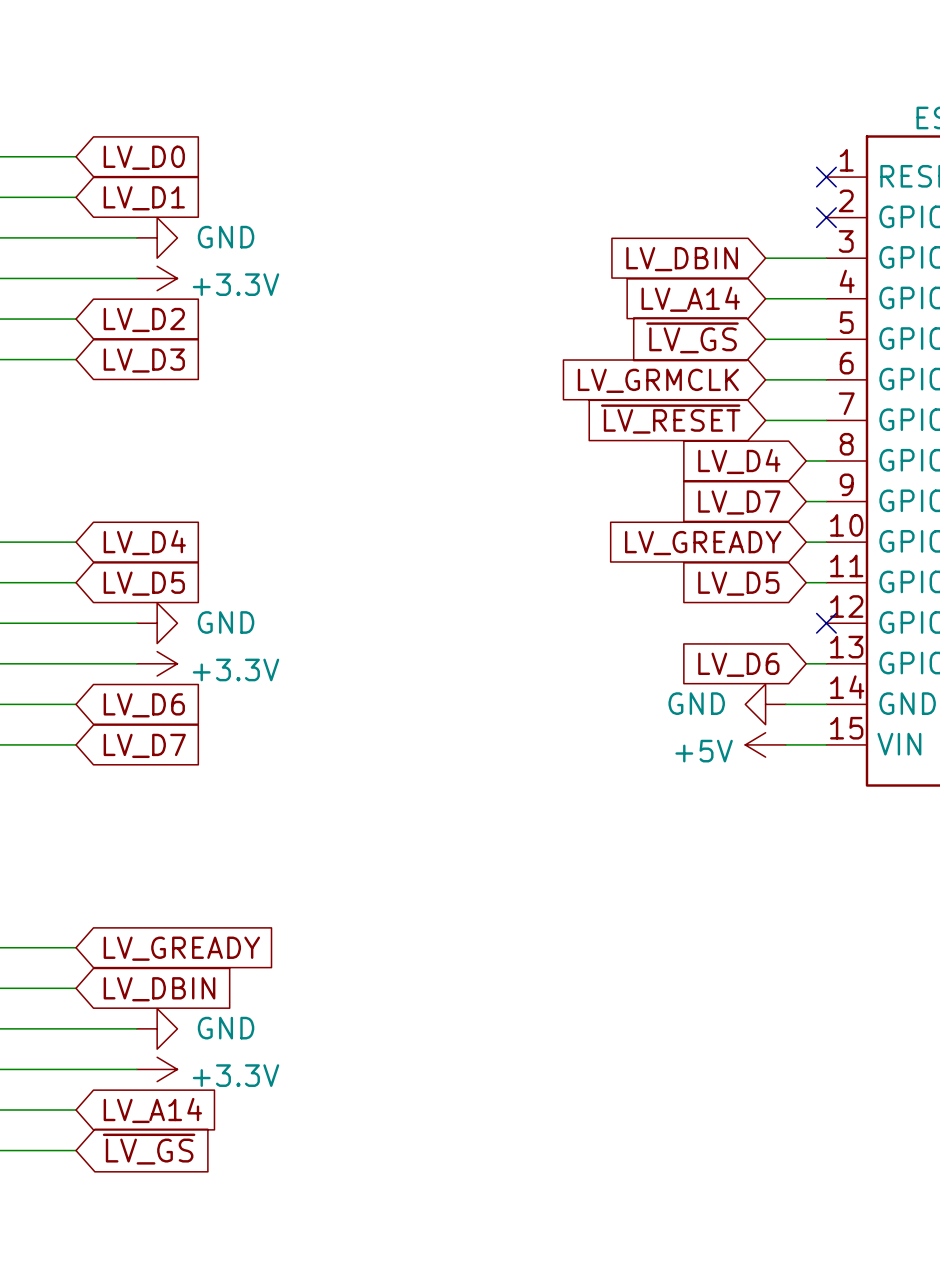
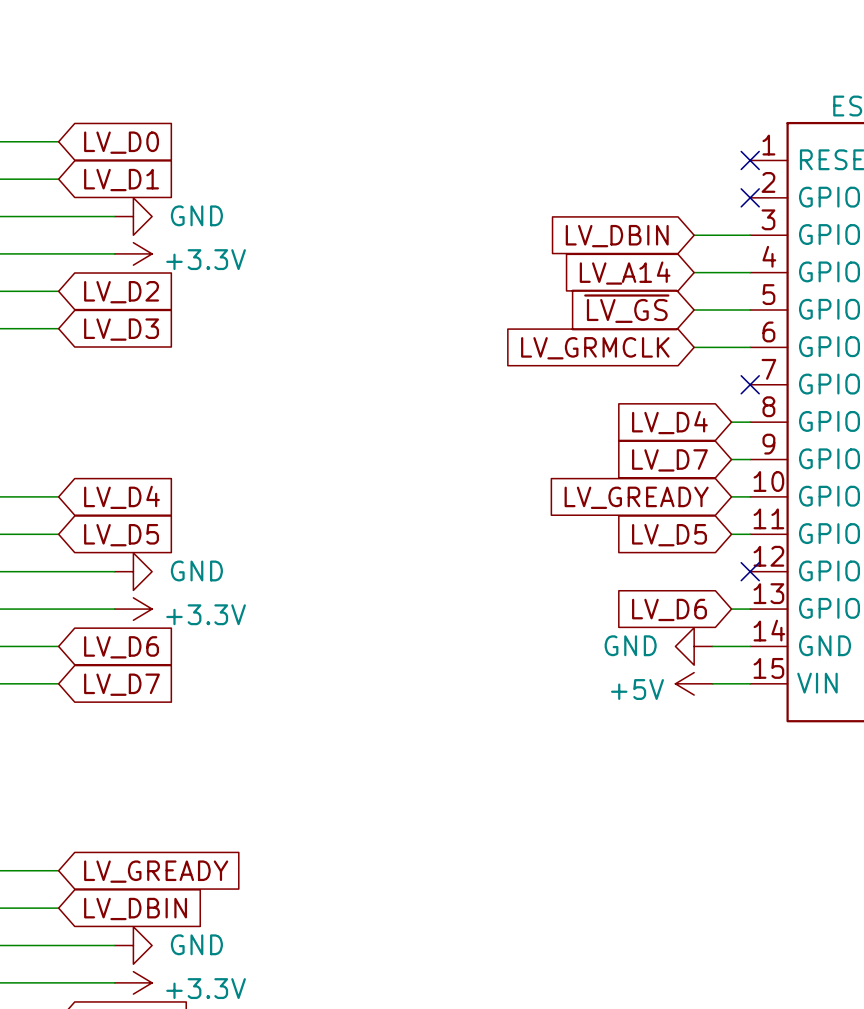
global label: ~{LV_RESET} (670, 419) -> none
wire: (765, 420) (826, 420) -> none
no-connect mark: none -> (750, 384)

